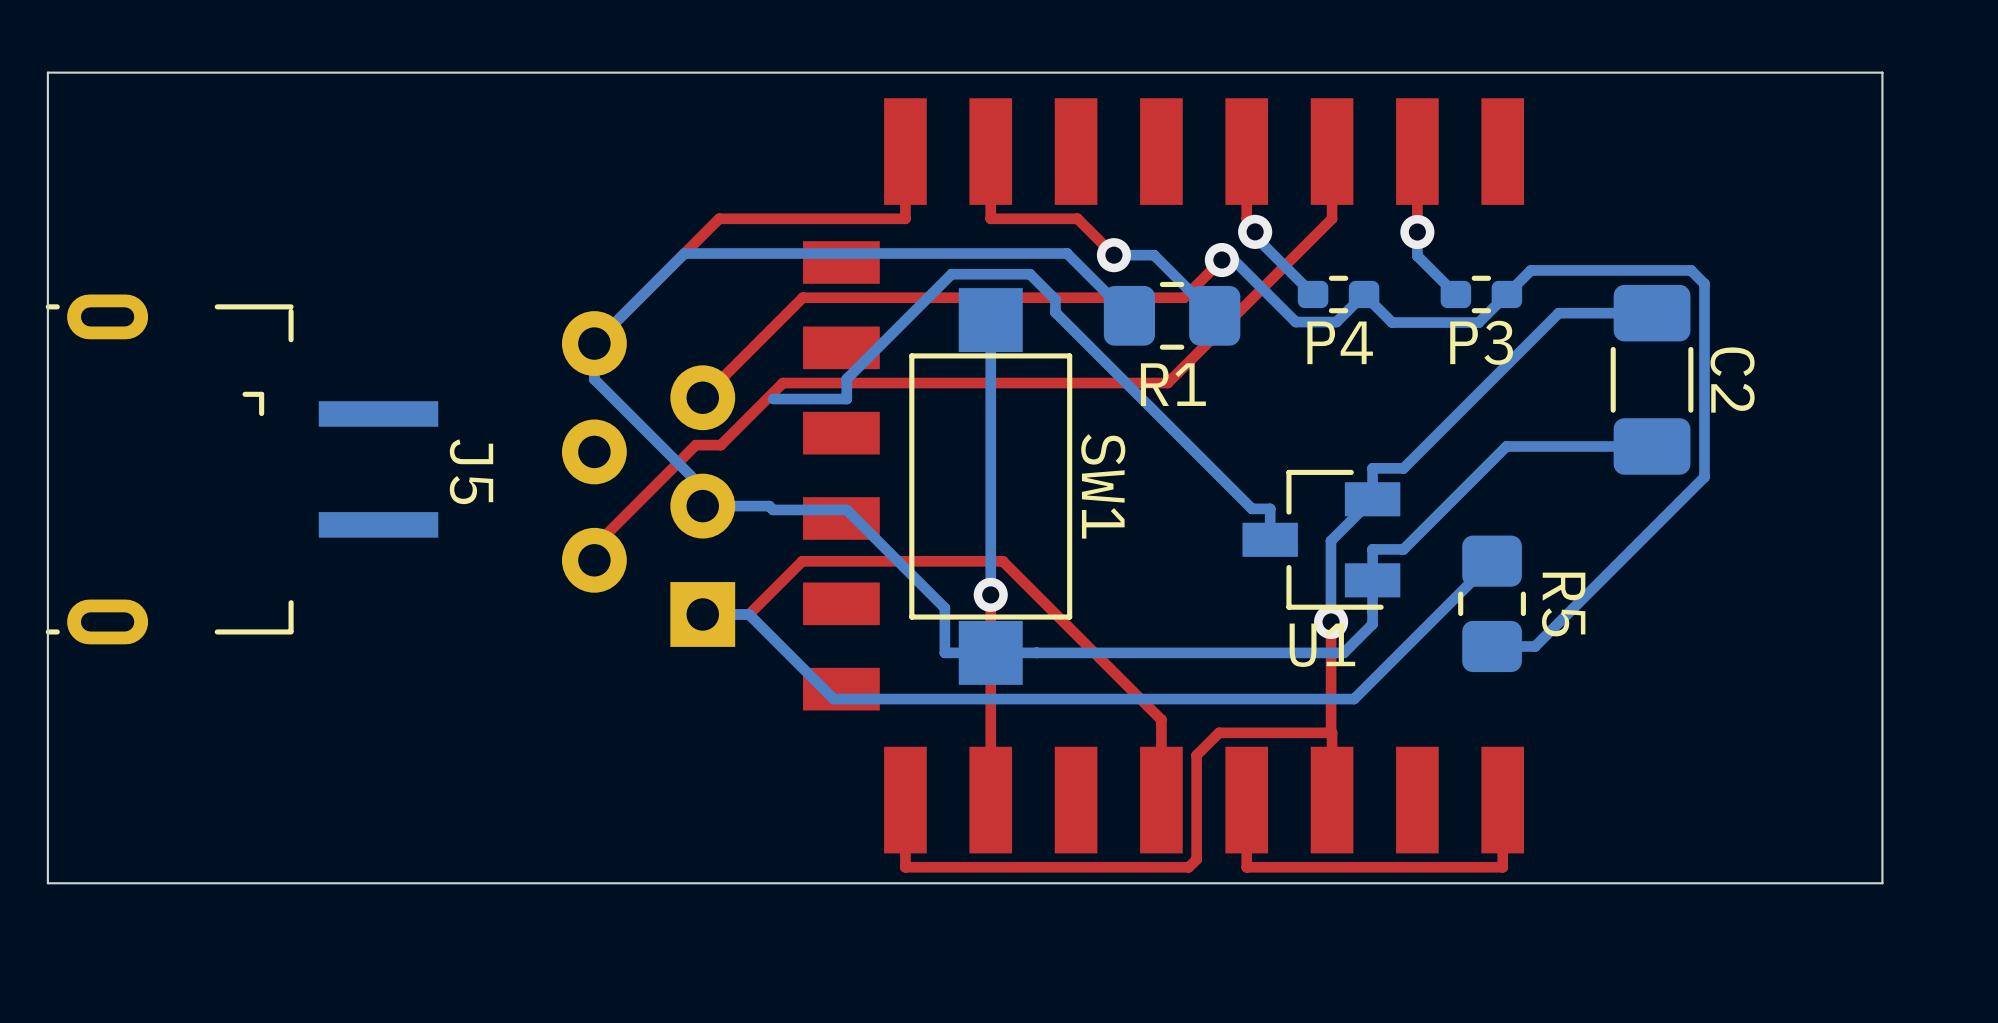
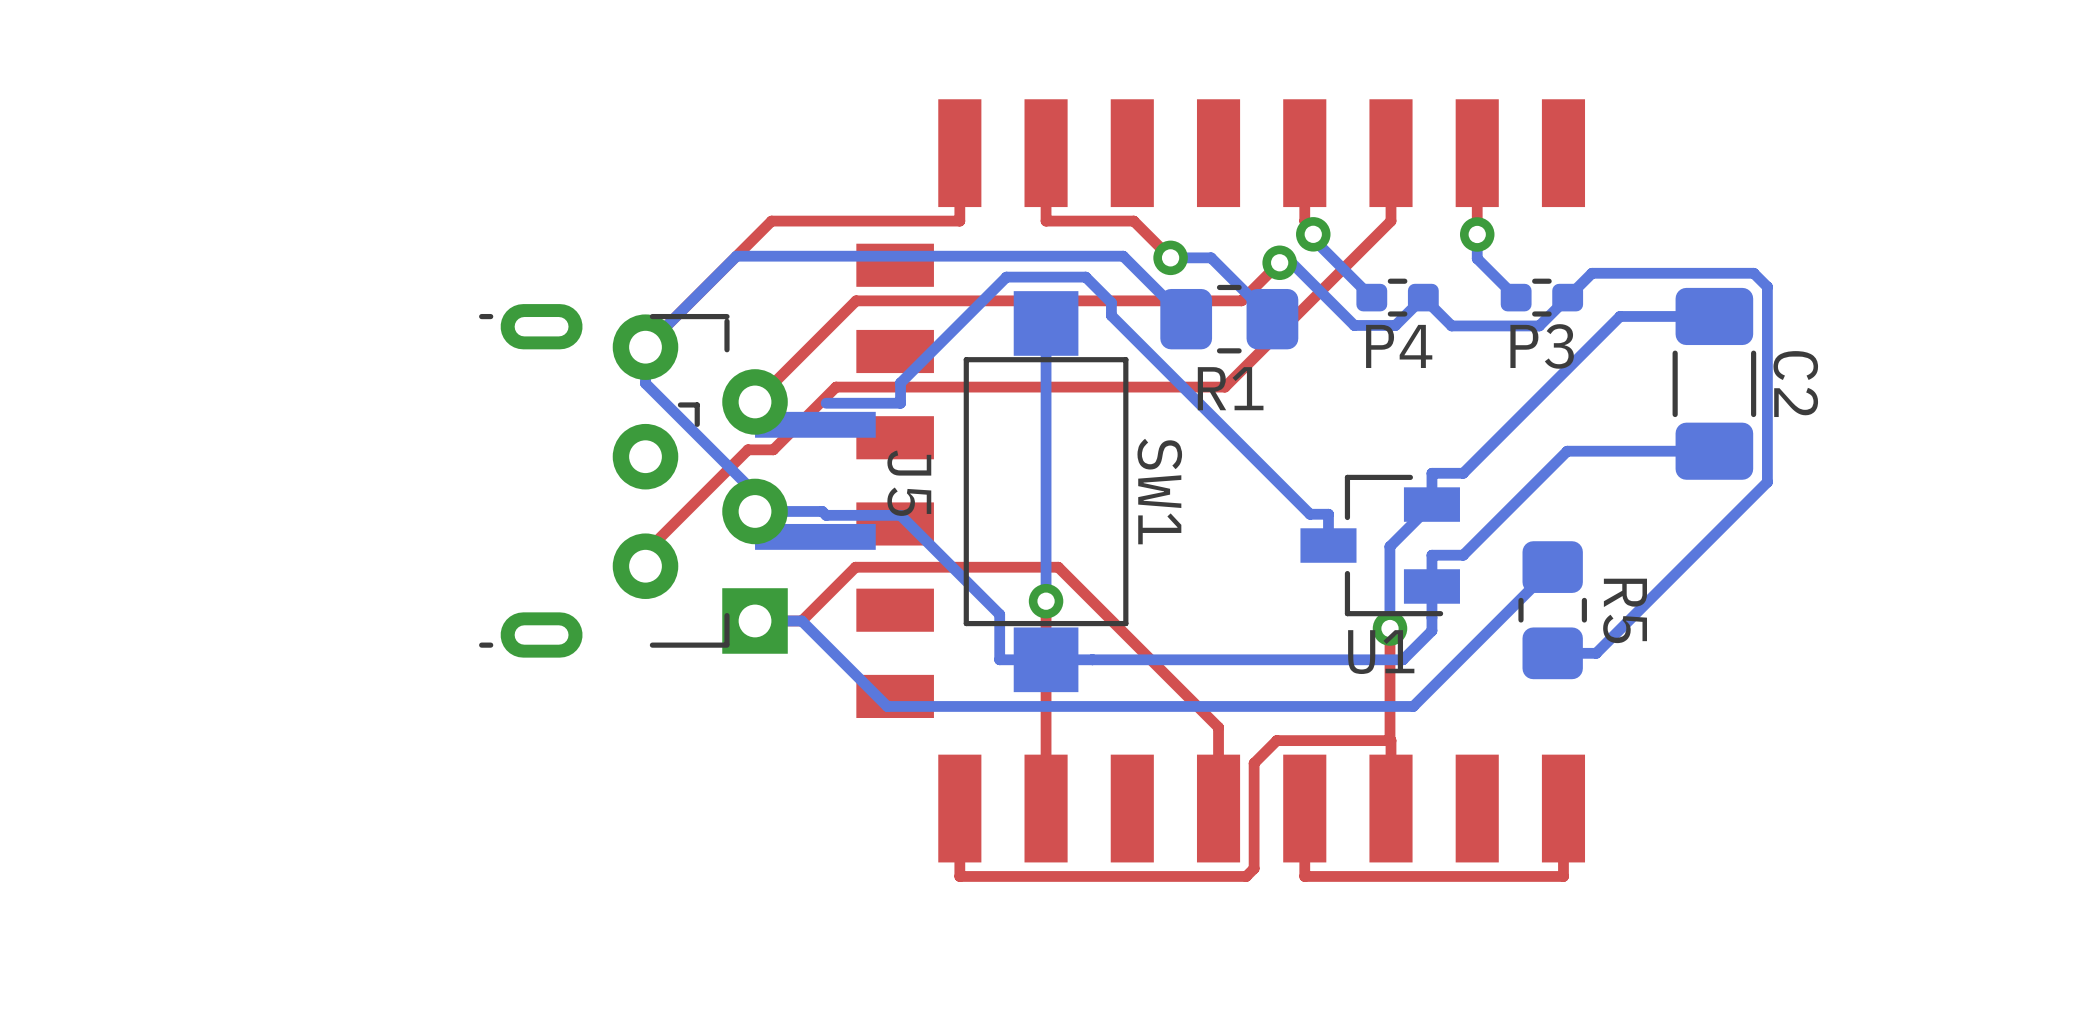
board edge: (1882, 72) (47, 72) (47, 883) (1882, 883) (1882, 72) -> none
J5 position: (242, 469) -> (677, 480)

